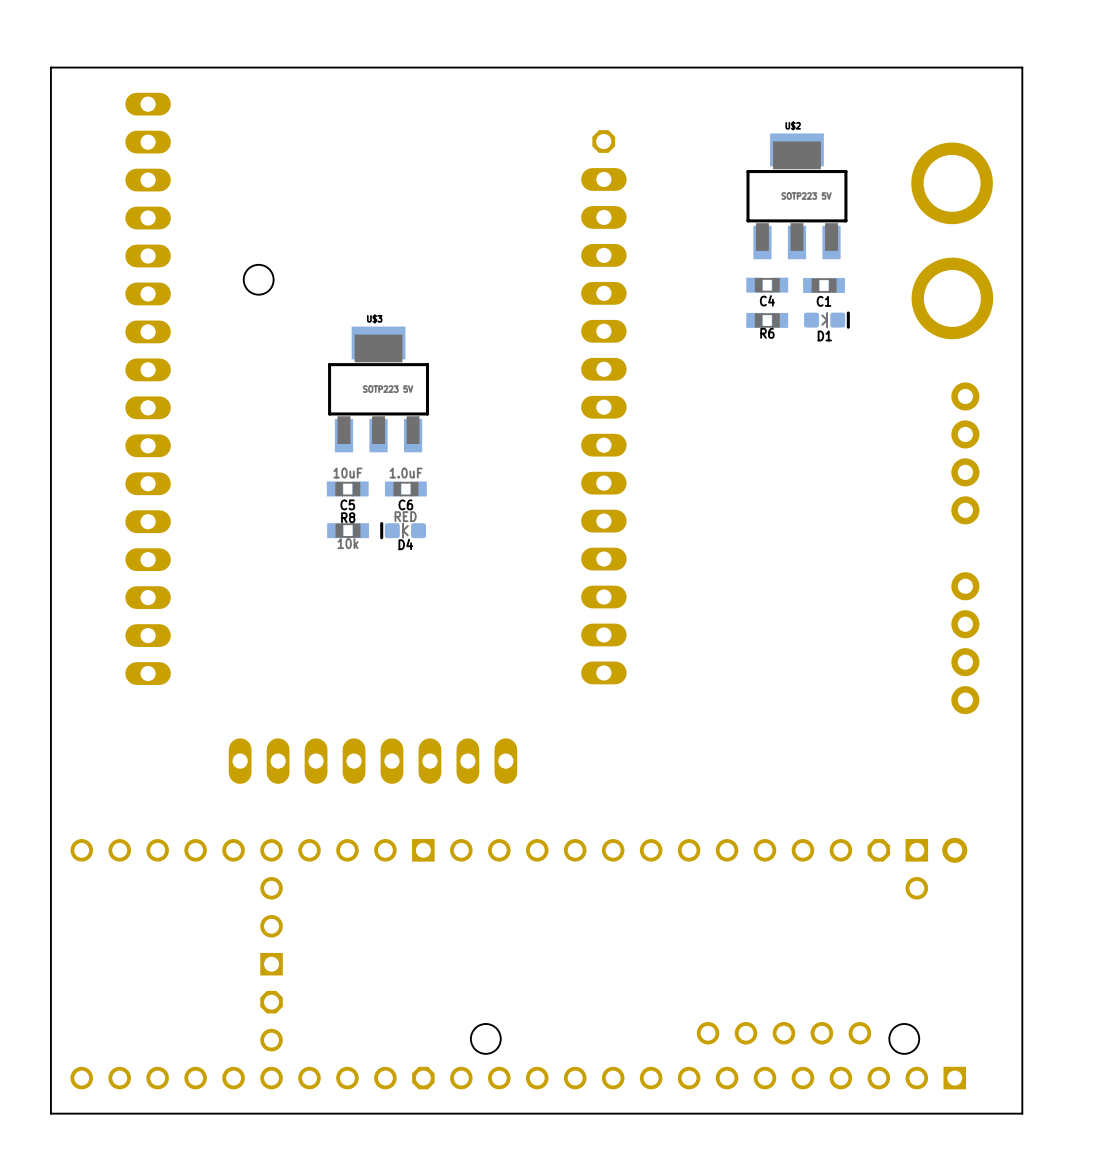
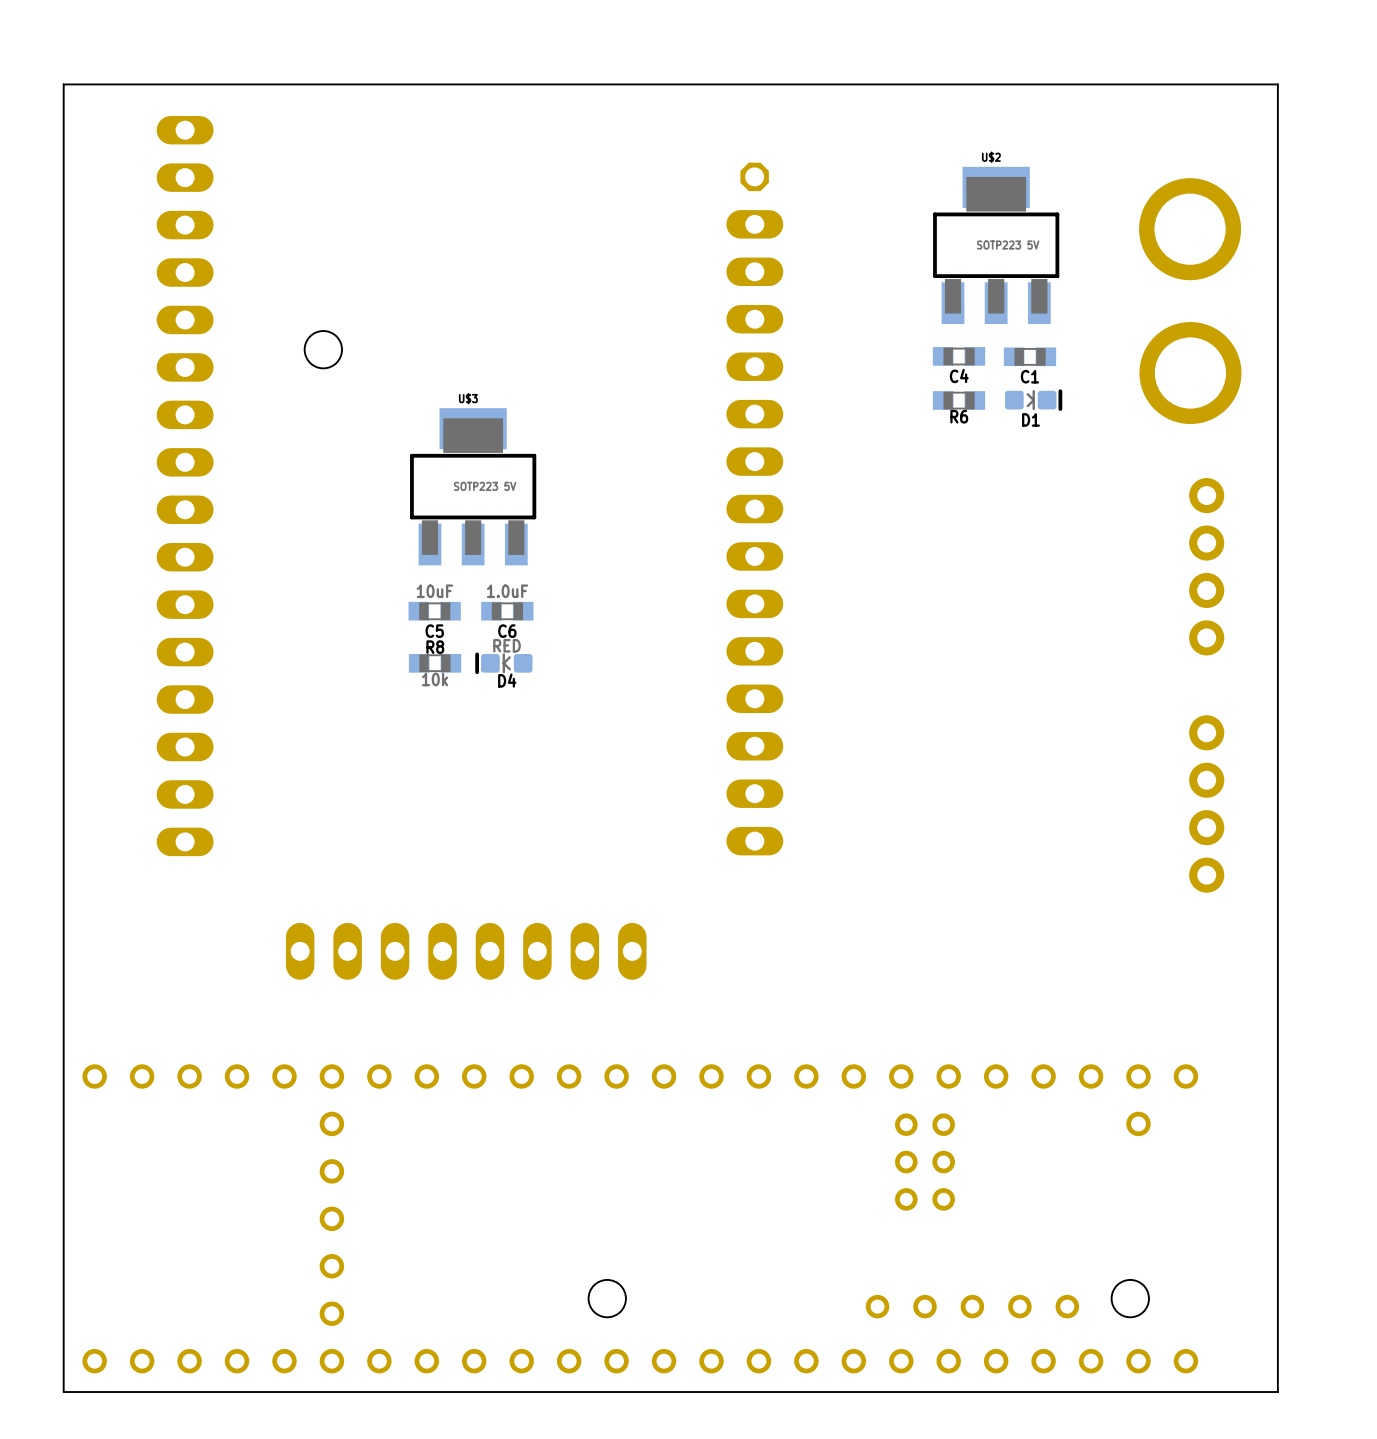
part footprint: [70, 837, 968, 1090] -> [82, 1064, 1199, 1374]

